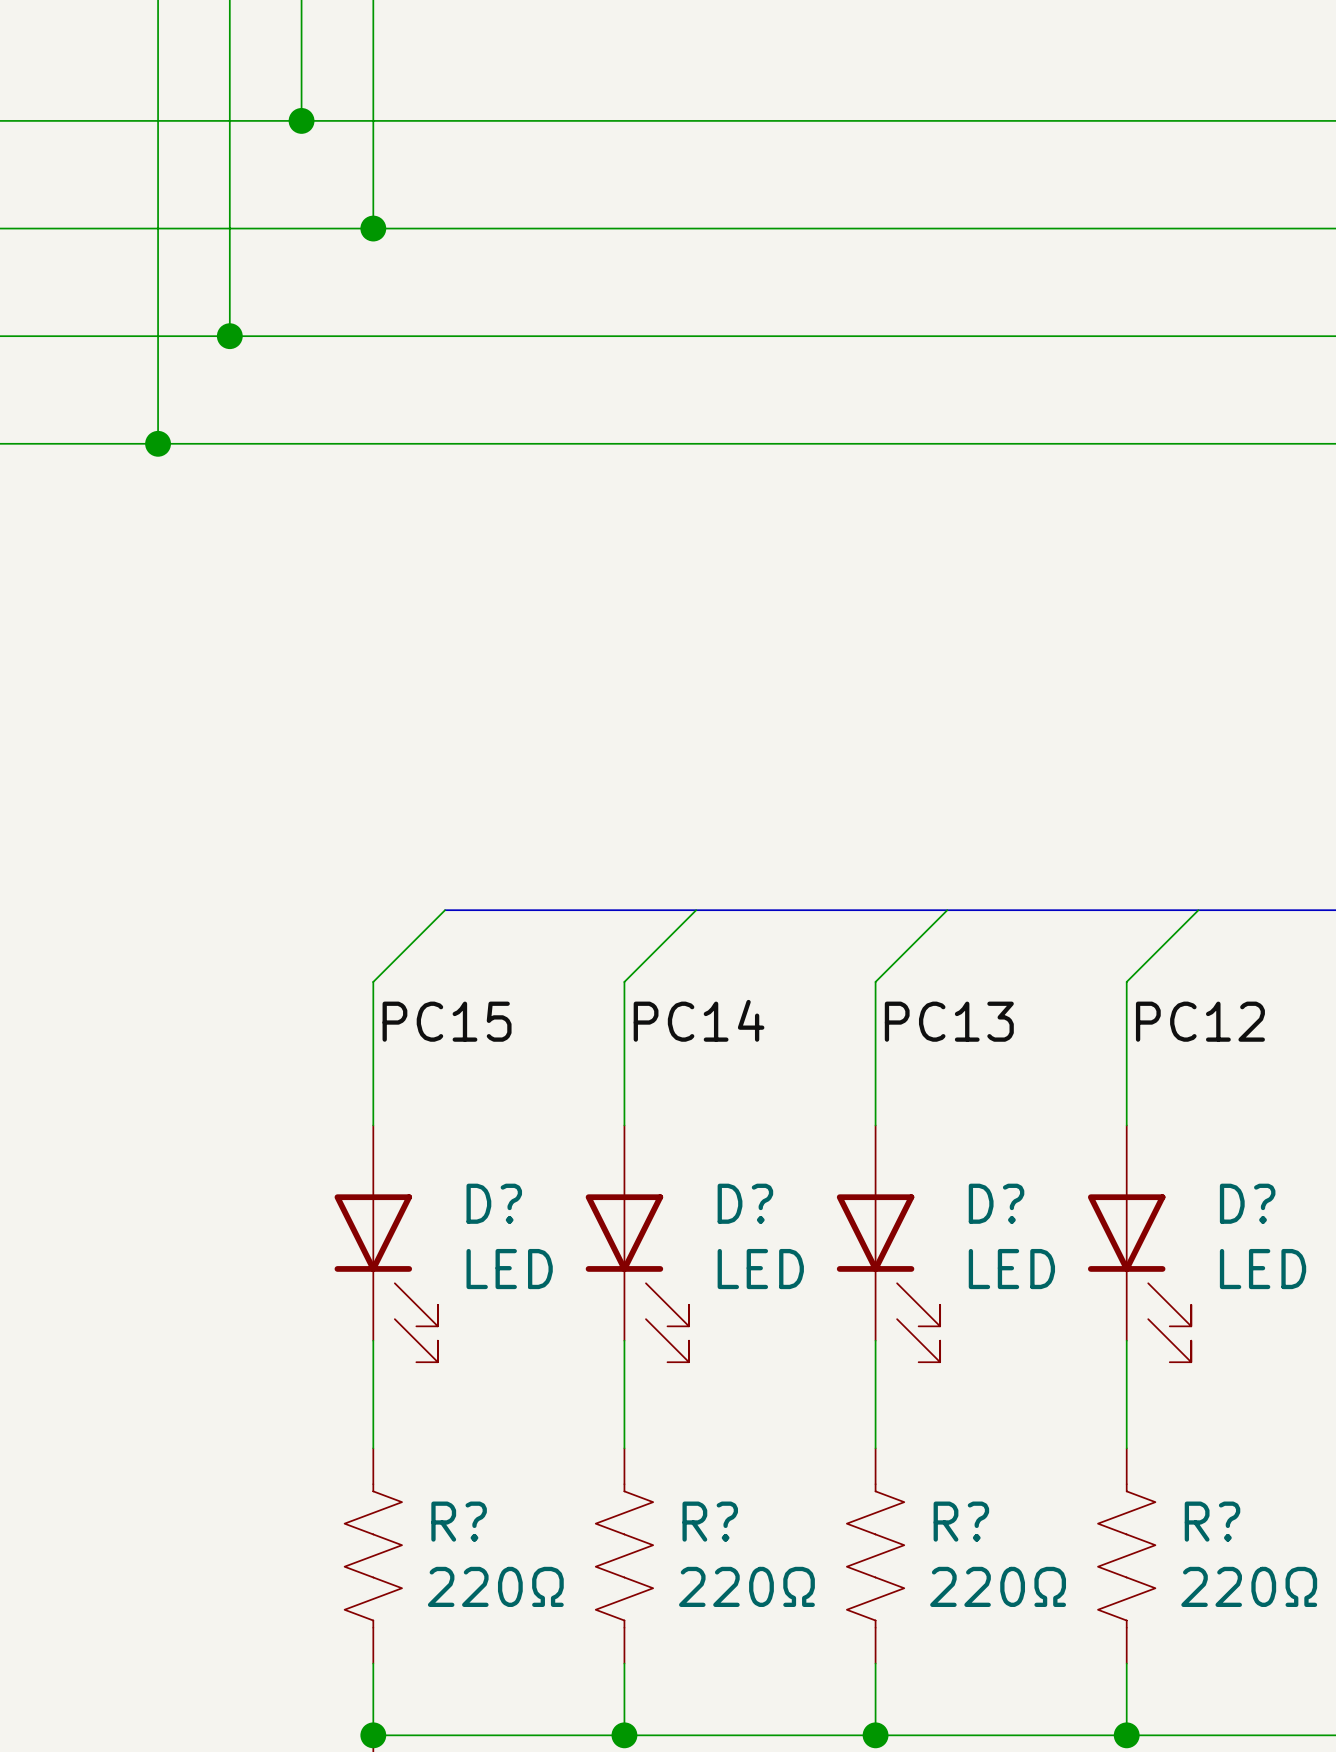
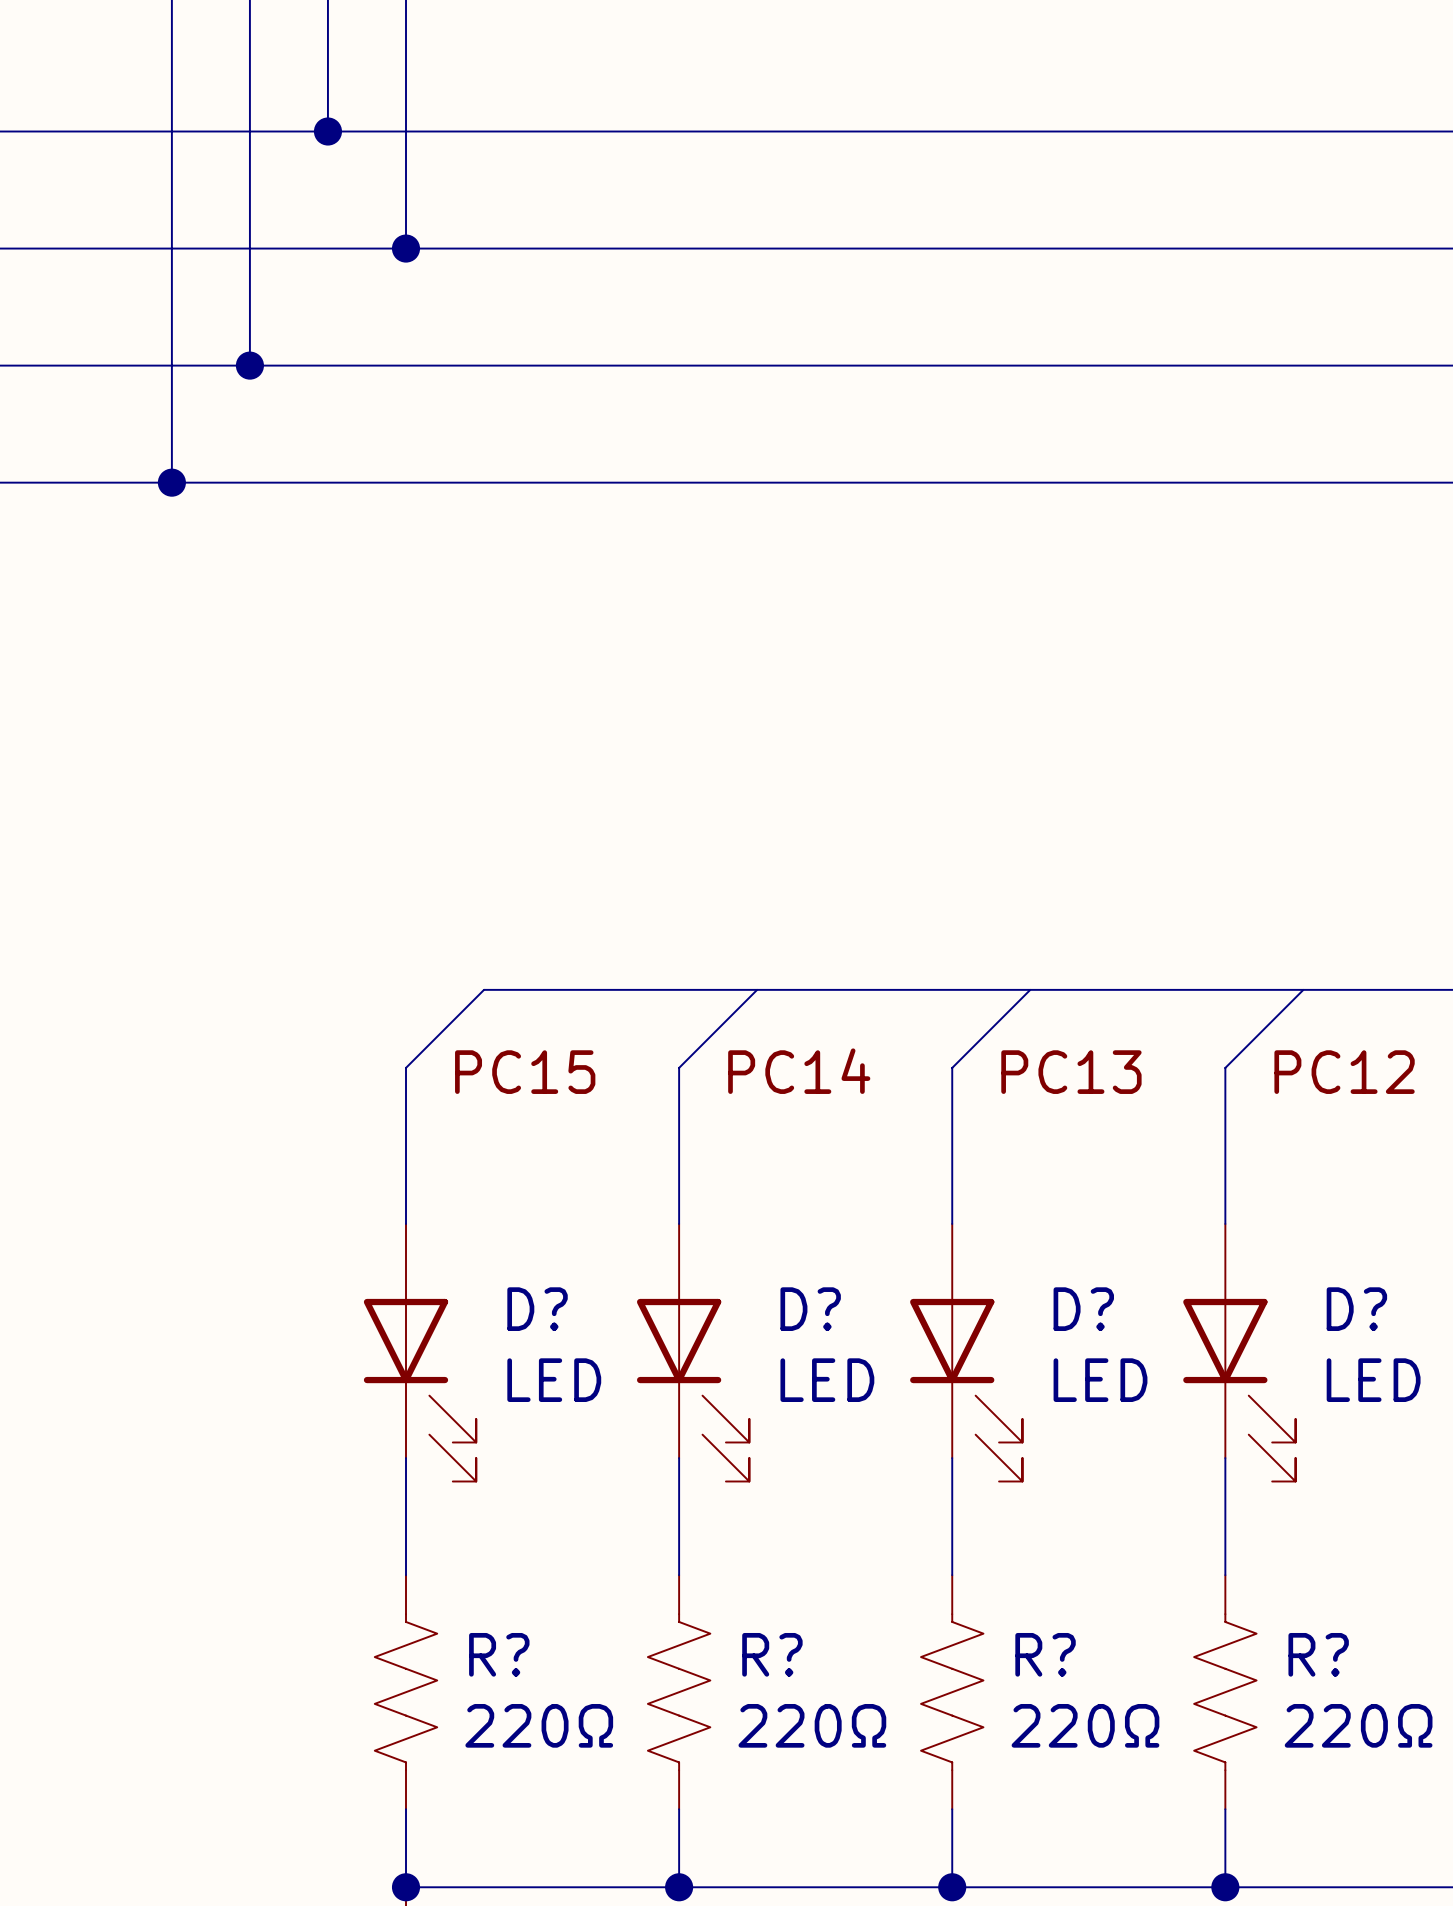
label position: PC14 (699, 1020) -> PC14 (799, 1071)
label position: PC15 (447, 1021) -> PC15 (525, 1072)
label position: PC13 (949, 1021) -> PC13 (1071, 1072)
label position: PC12 (1200, 1021) -> PC12 (1344, 1072)

